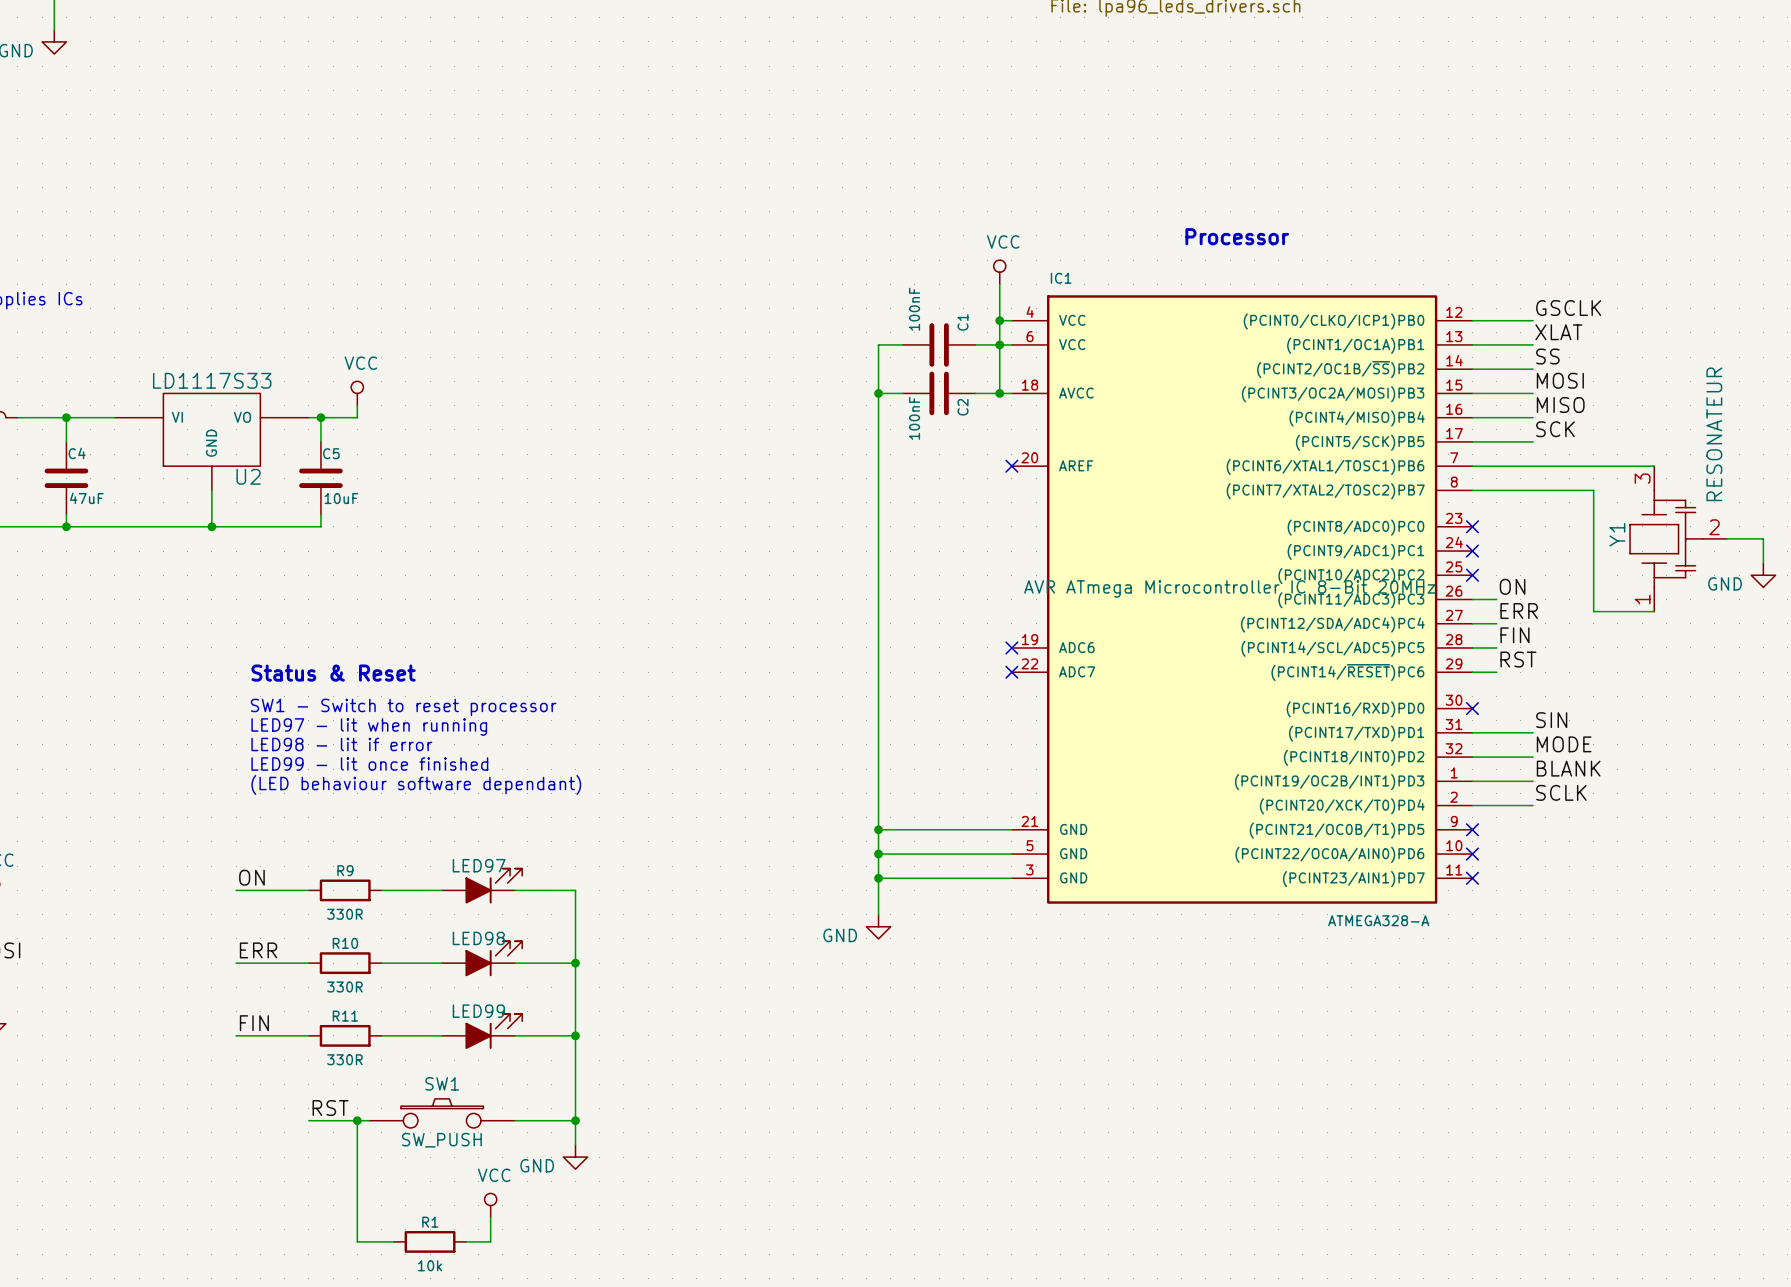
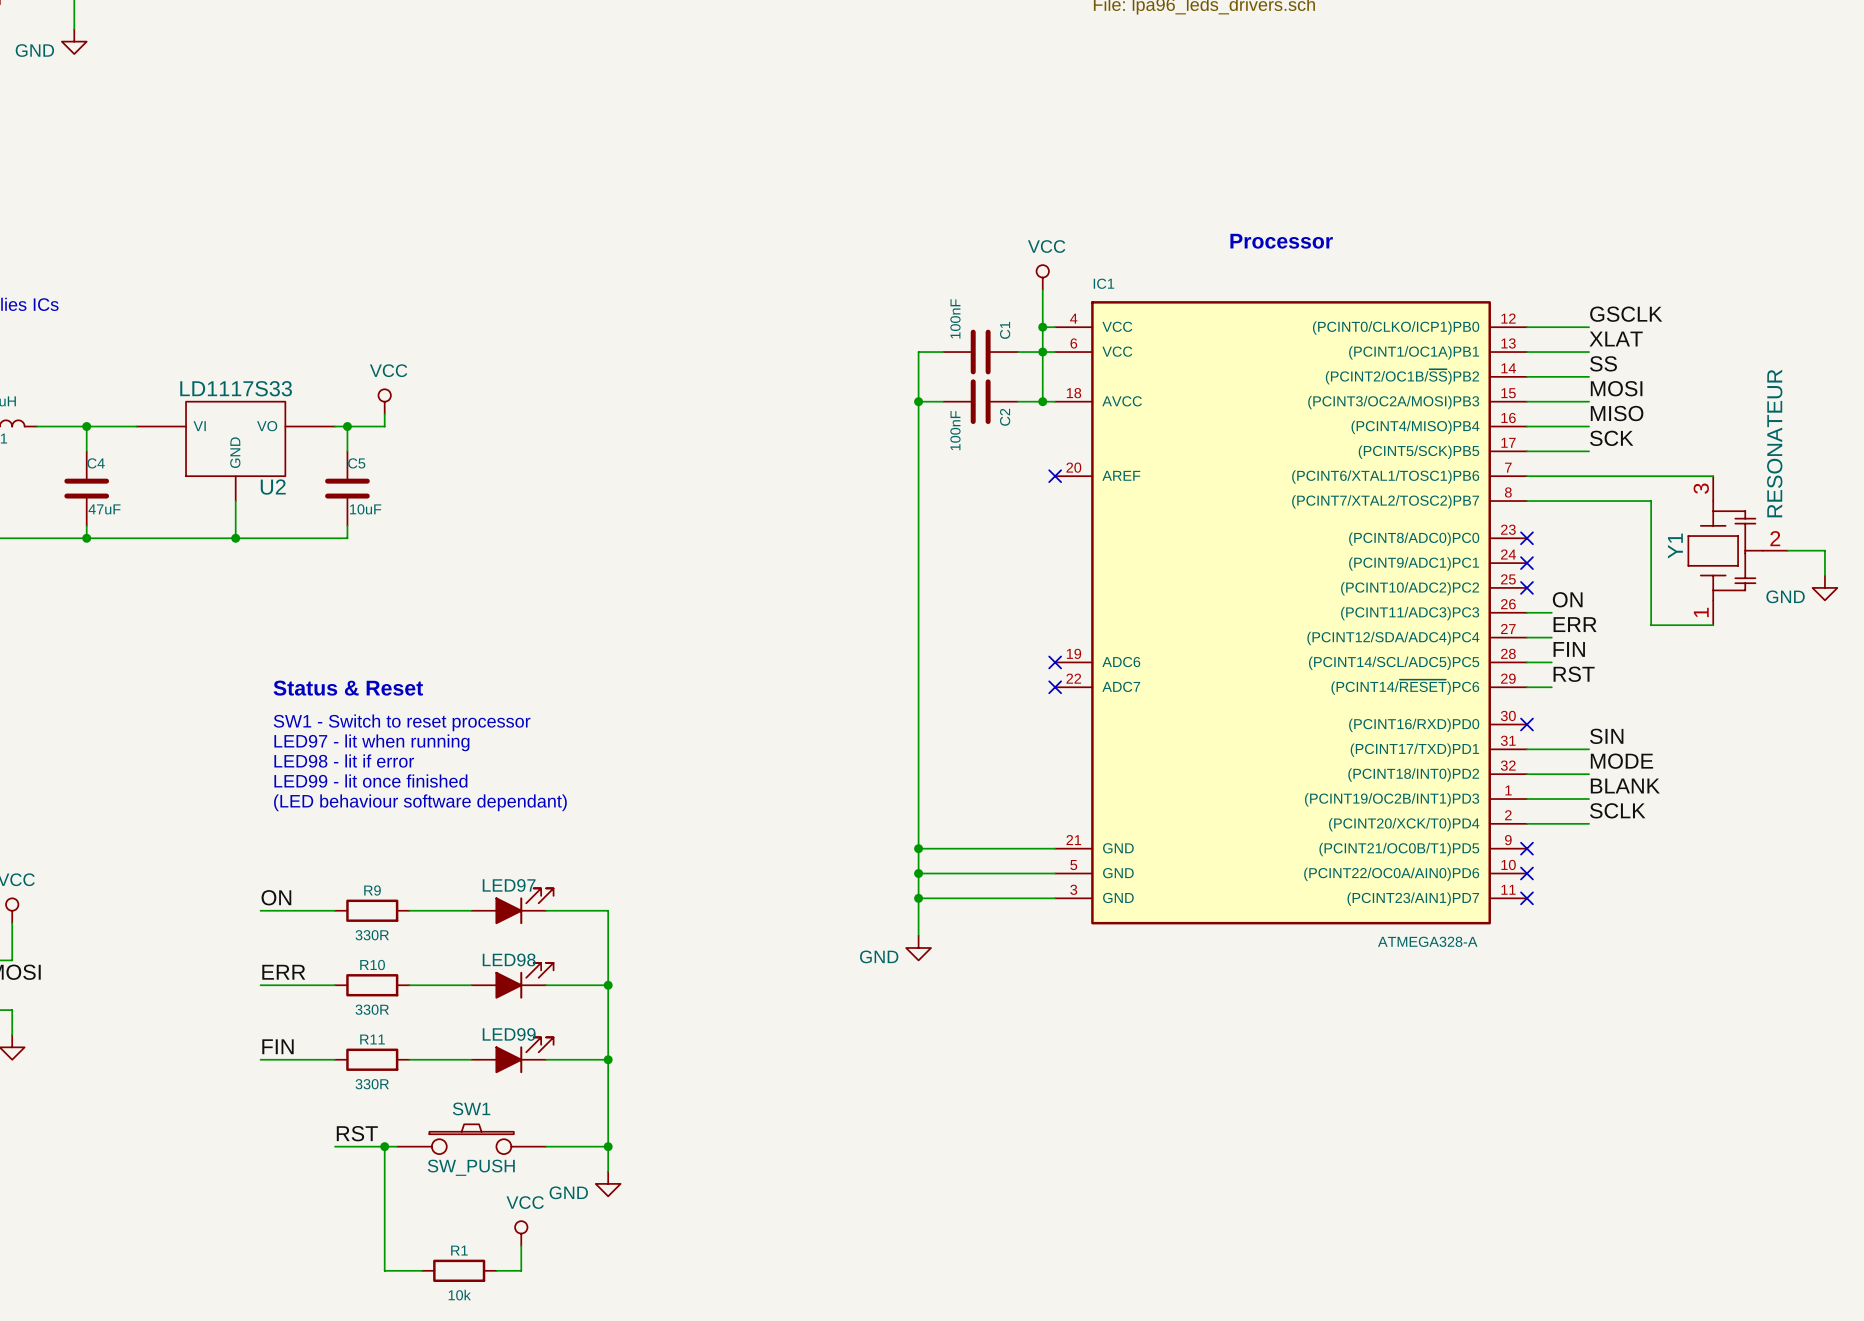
IC1 text: AVR ATmega Microcontroller IC 8-Bit 20MHz (1229, 588) -> none

